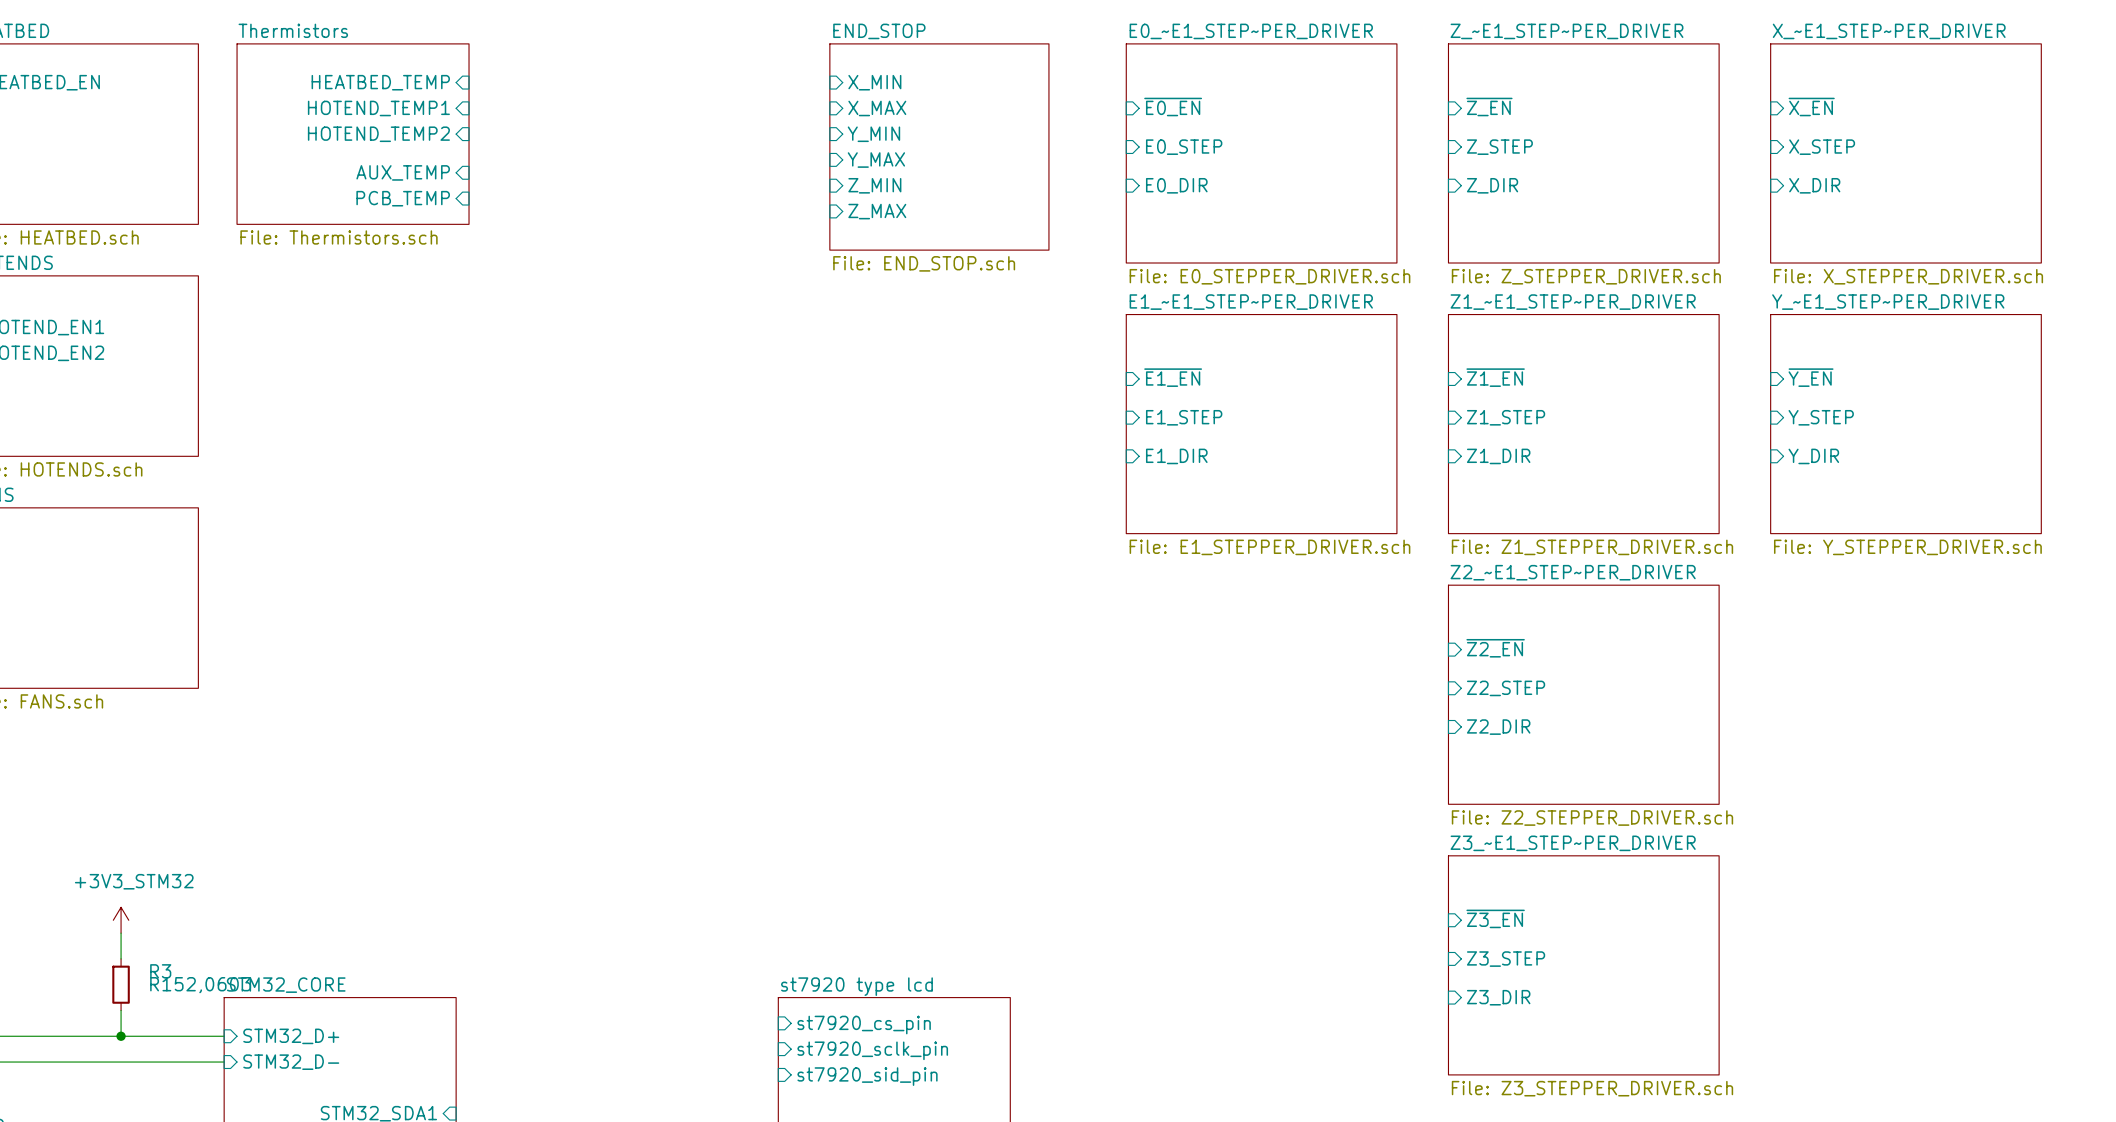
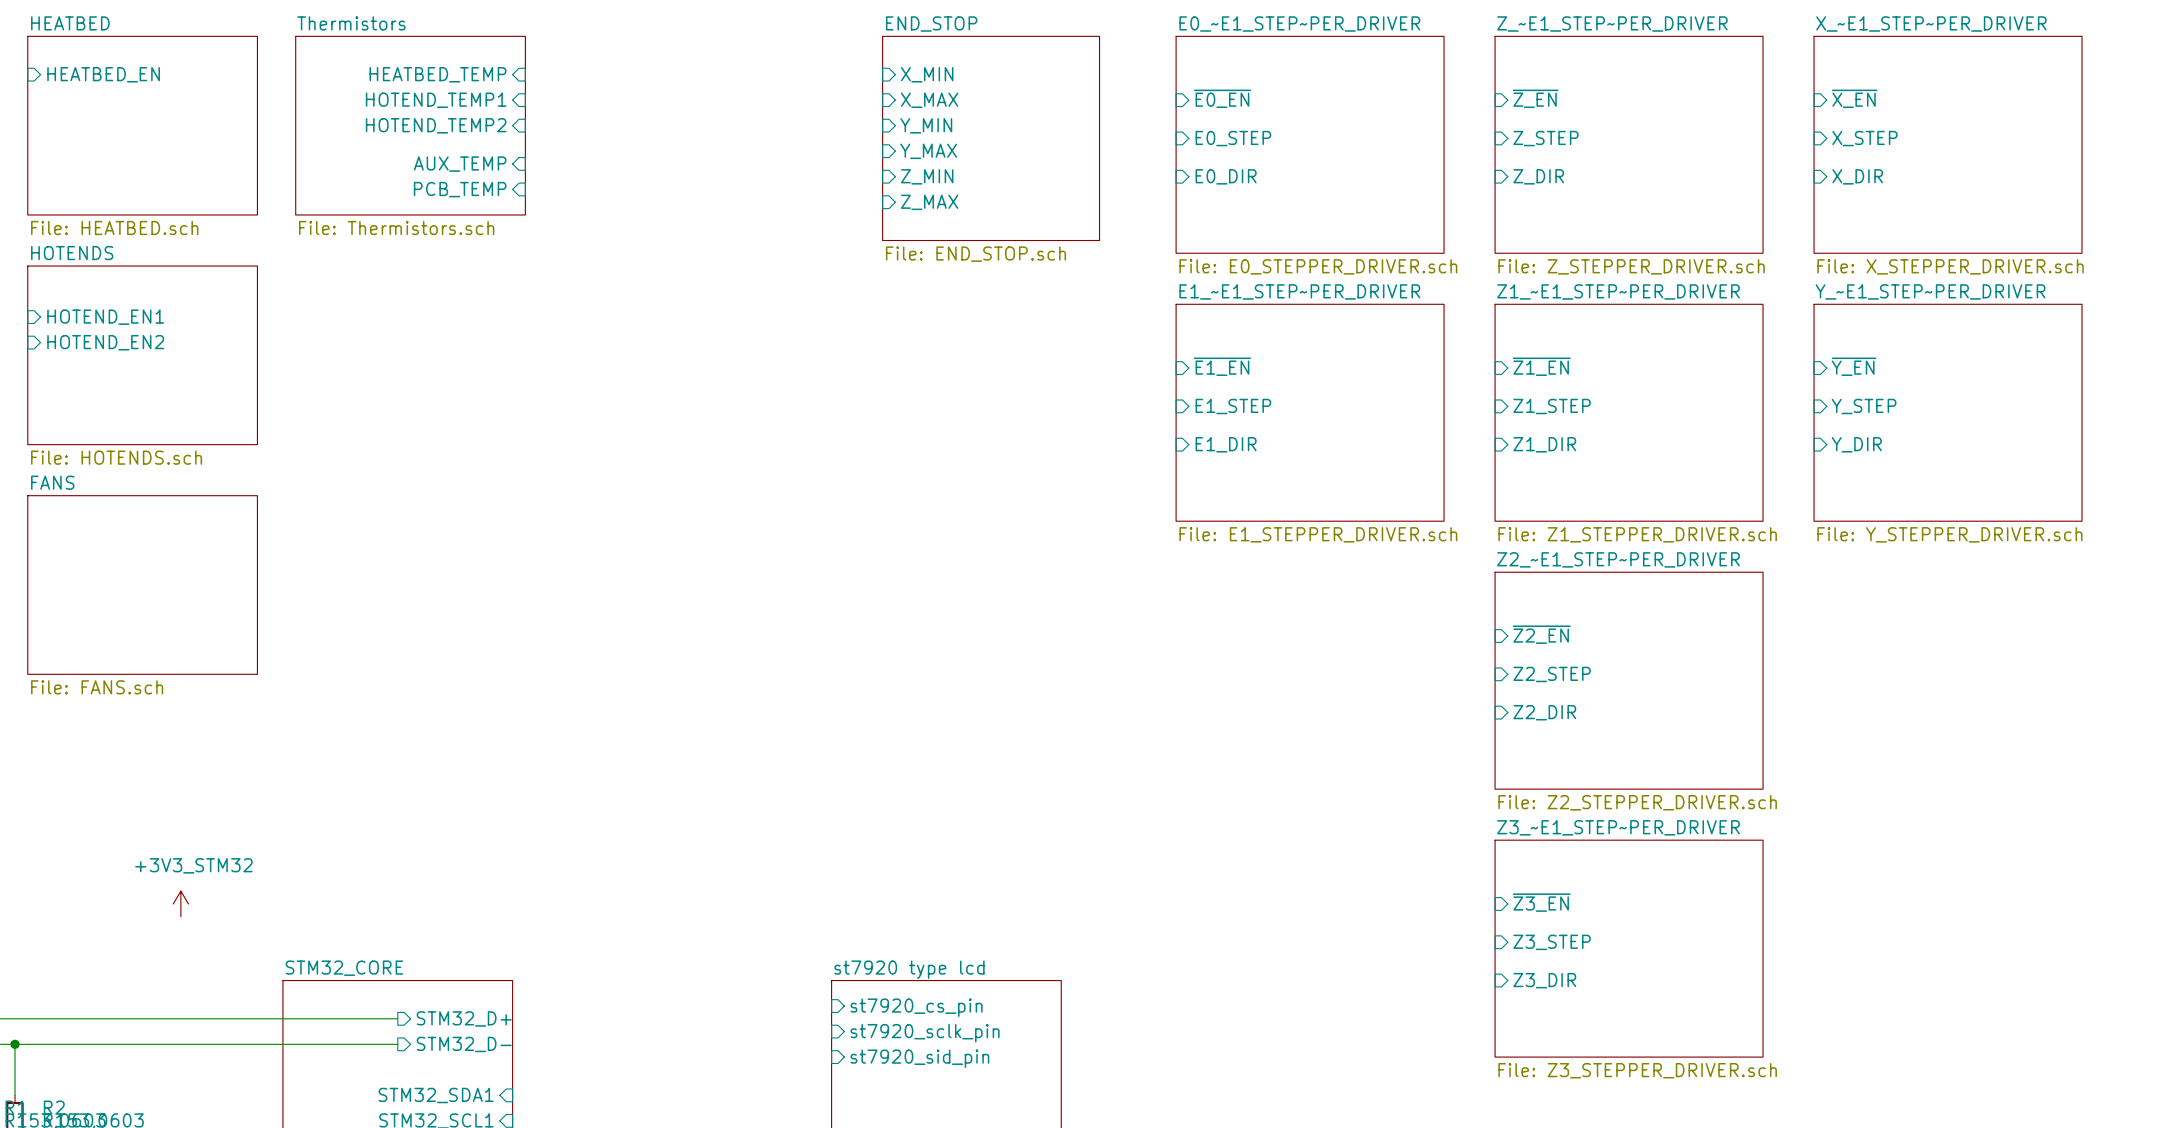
wire: (121, 933) (121, 958) -> none
R3: R152,0603 (121, 984) -> none
wire: (121, 1010) (121, 1036) -> none
junction: (121, 1036) -> none
wire: none -> (282, 1018) (397, 1018)
sheet pin position: STM32_D+ (291, 1036) -> STM32_D+ (464, 1018)
wire: none -> (282, 1044) (397, 1044)
sheet pin position: STM32_D- (291, 1062) -> STM32_D- (464, 1044)

